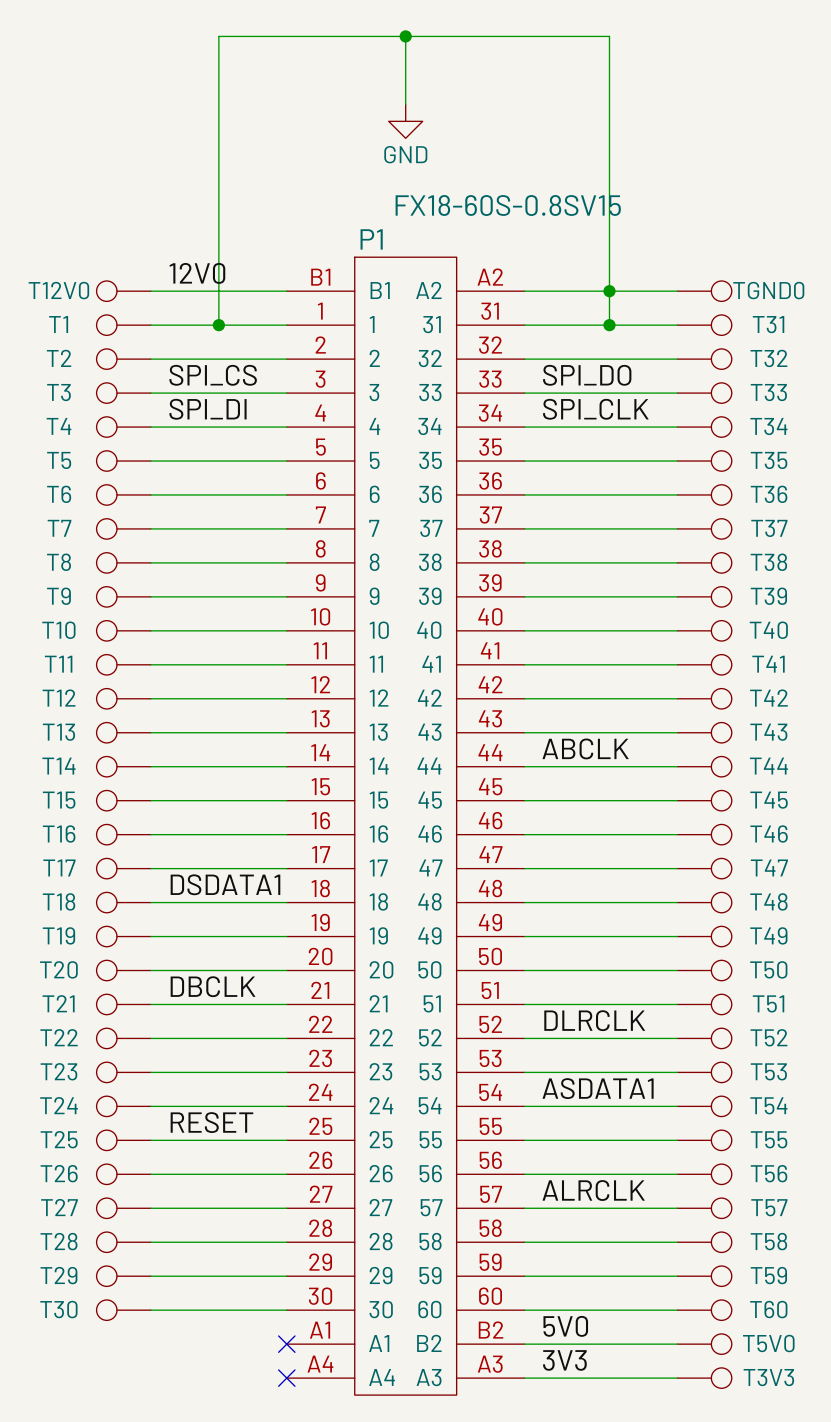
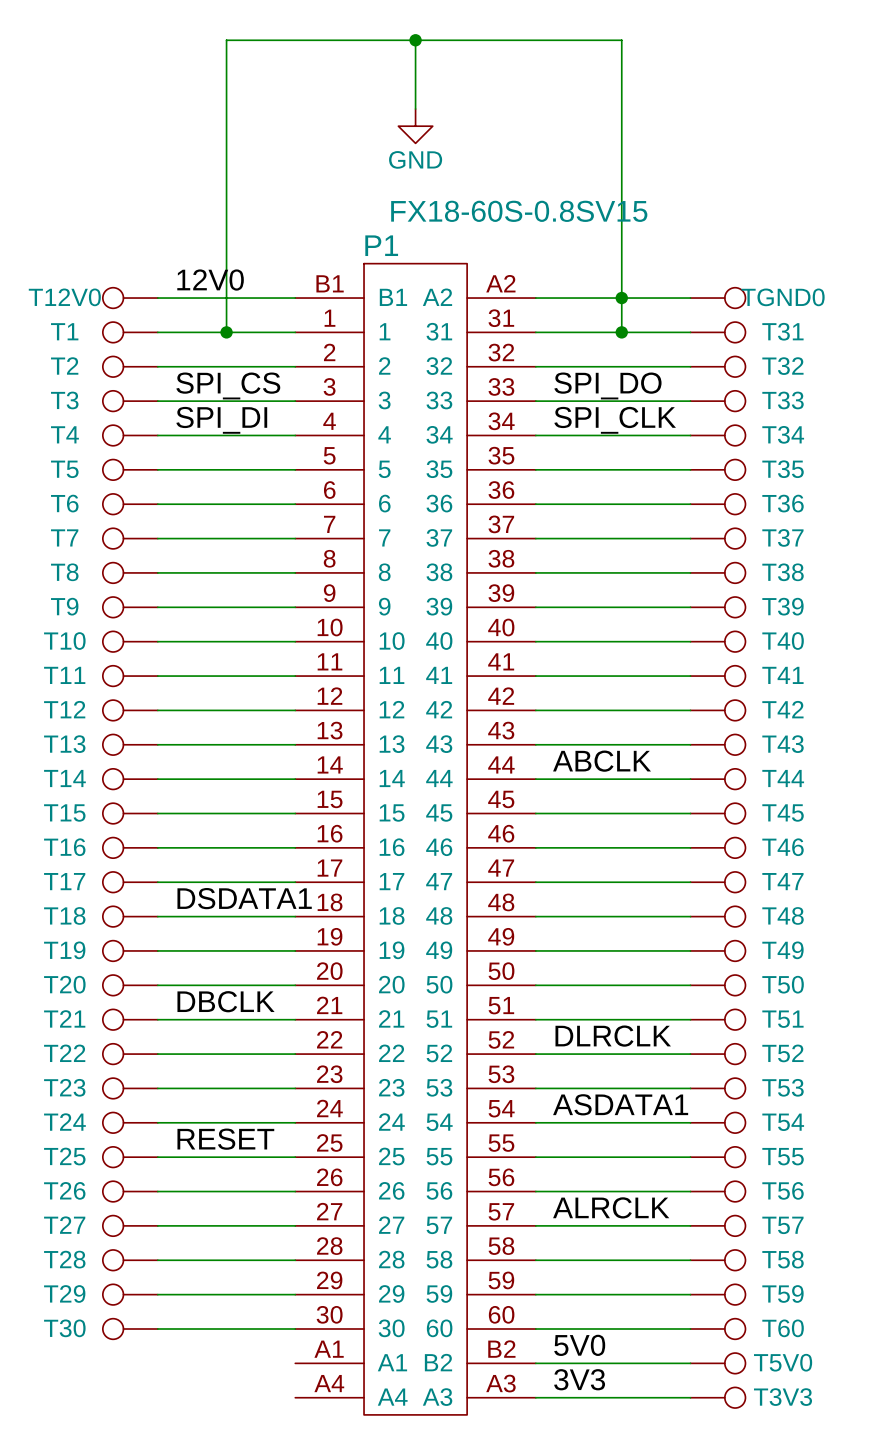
no-connect mark: (286, 1344) -> none
no-connect mark: (286, 1378) -> none

